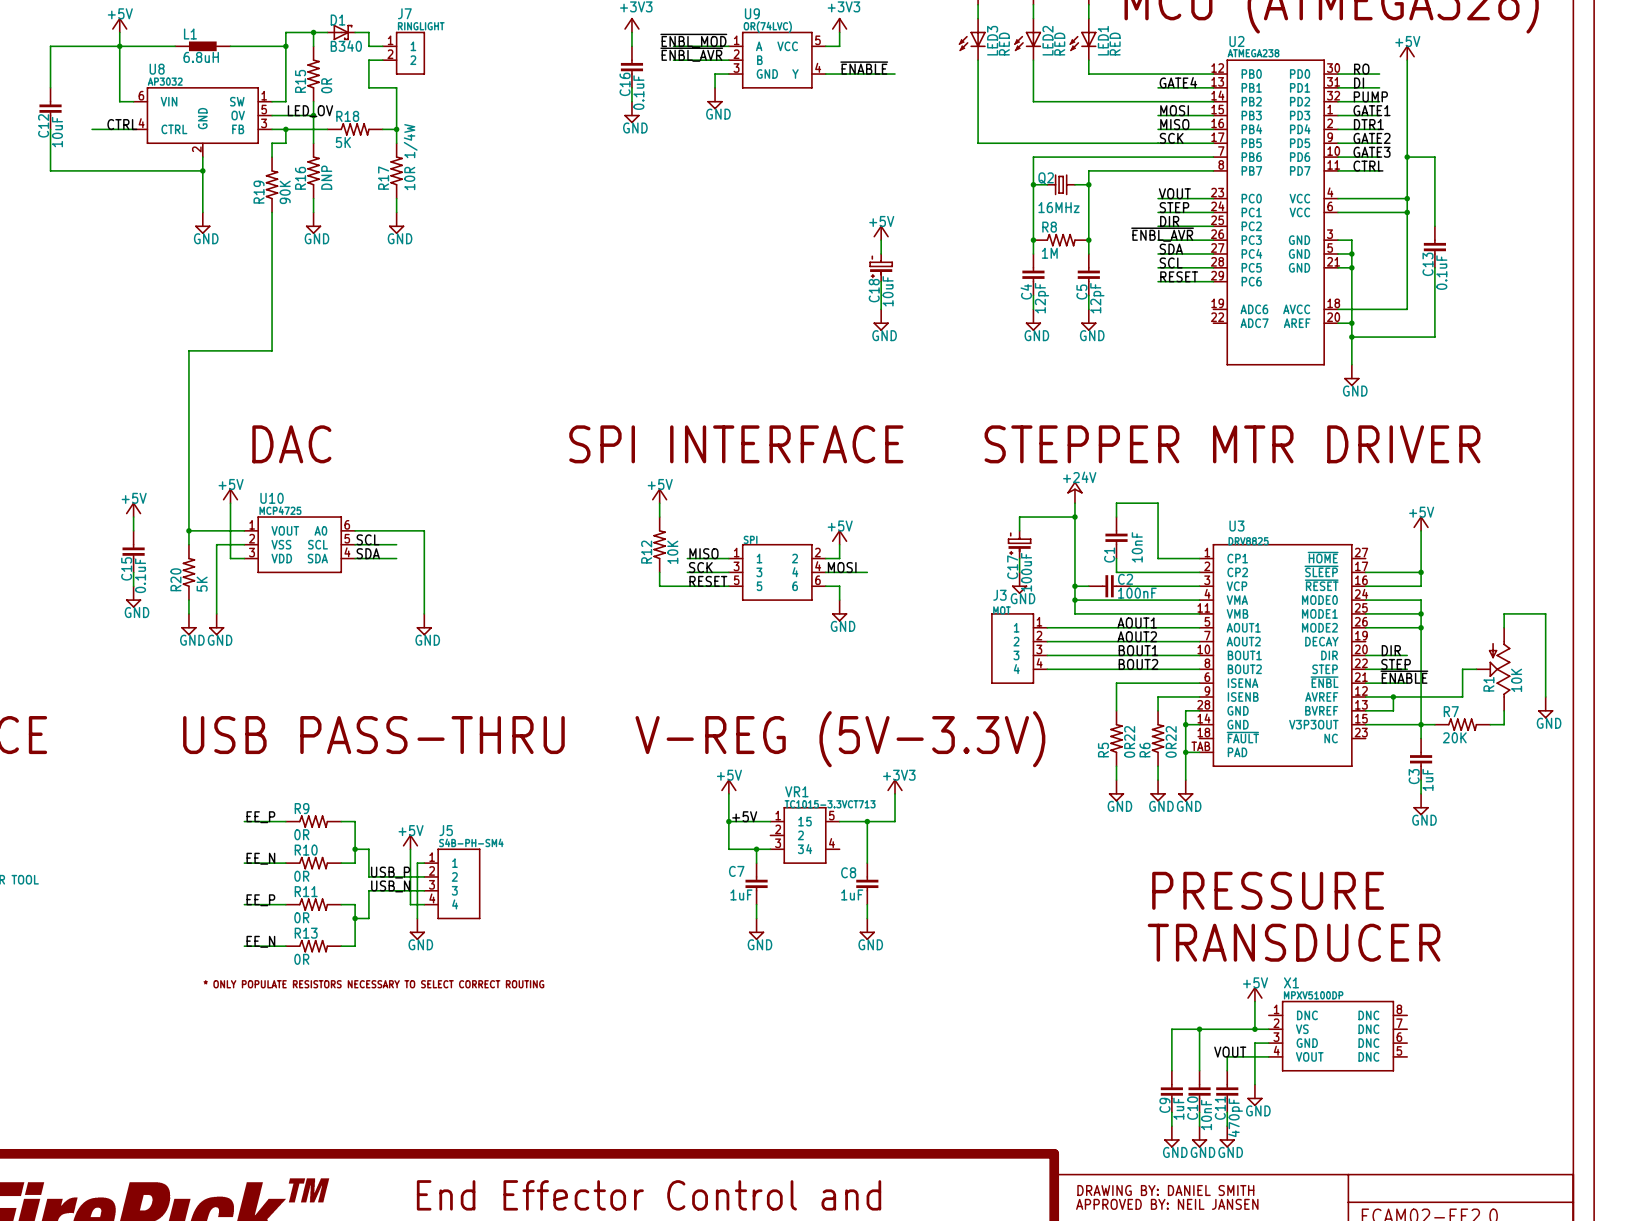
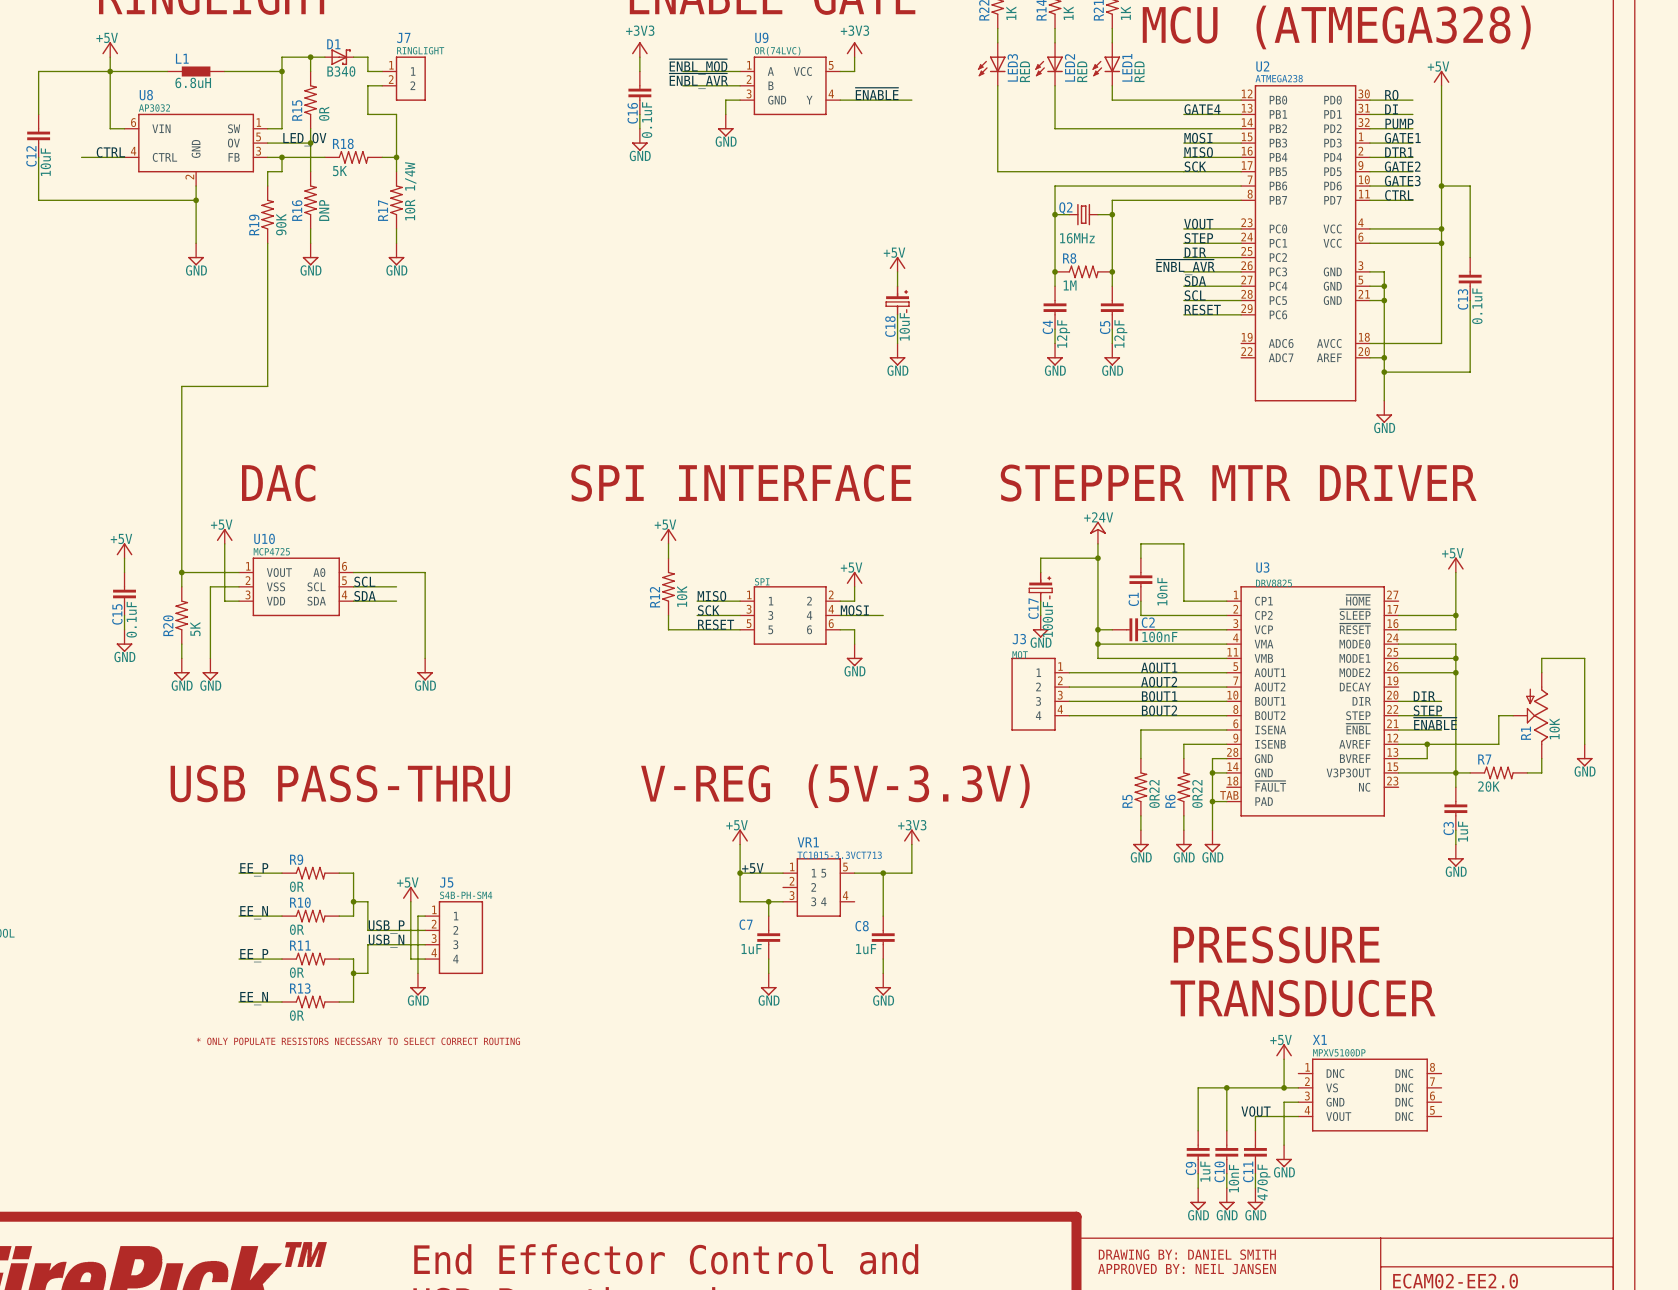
C18 rotation: 0° (881, 267) -> 180° (897, 300)
C17 rotation: 0° (1019, 544) -> 180° (1040, 586)

